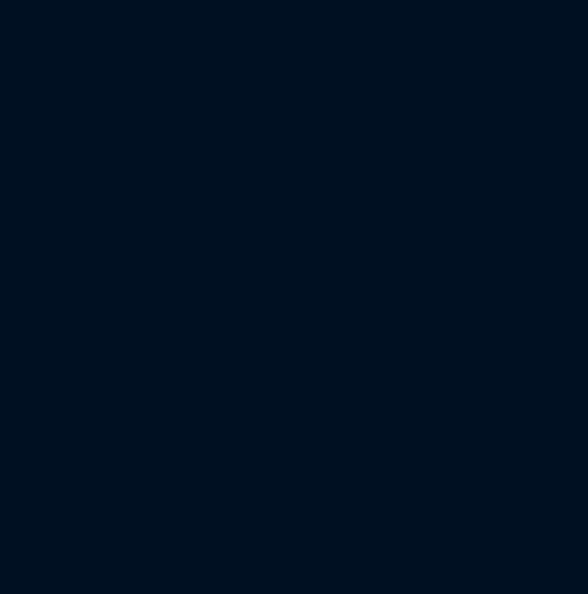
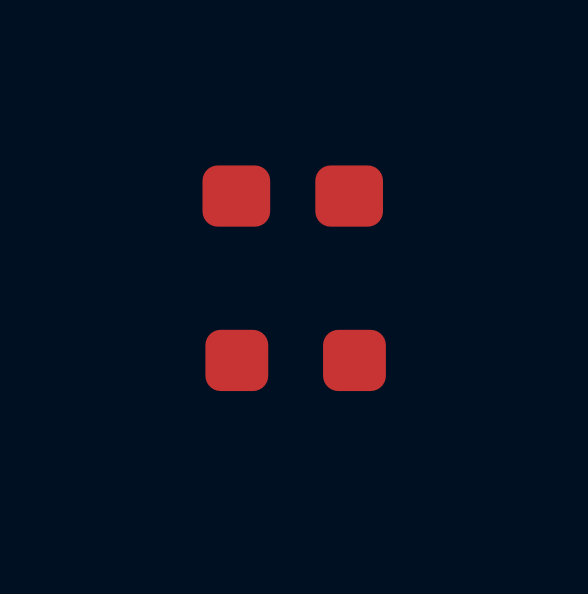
part: none -> (292, 196)
part: none -> (295, 360)

